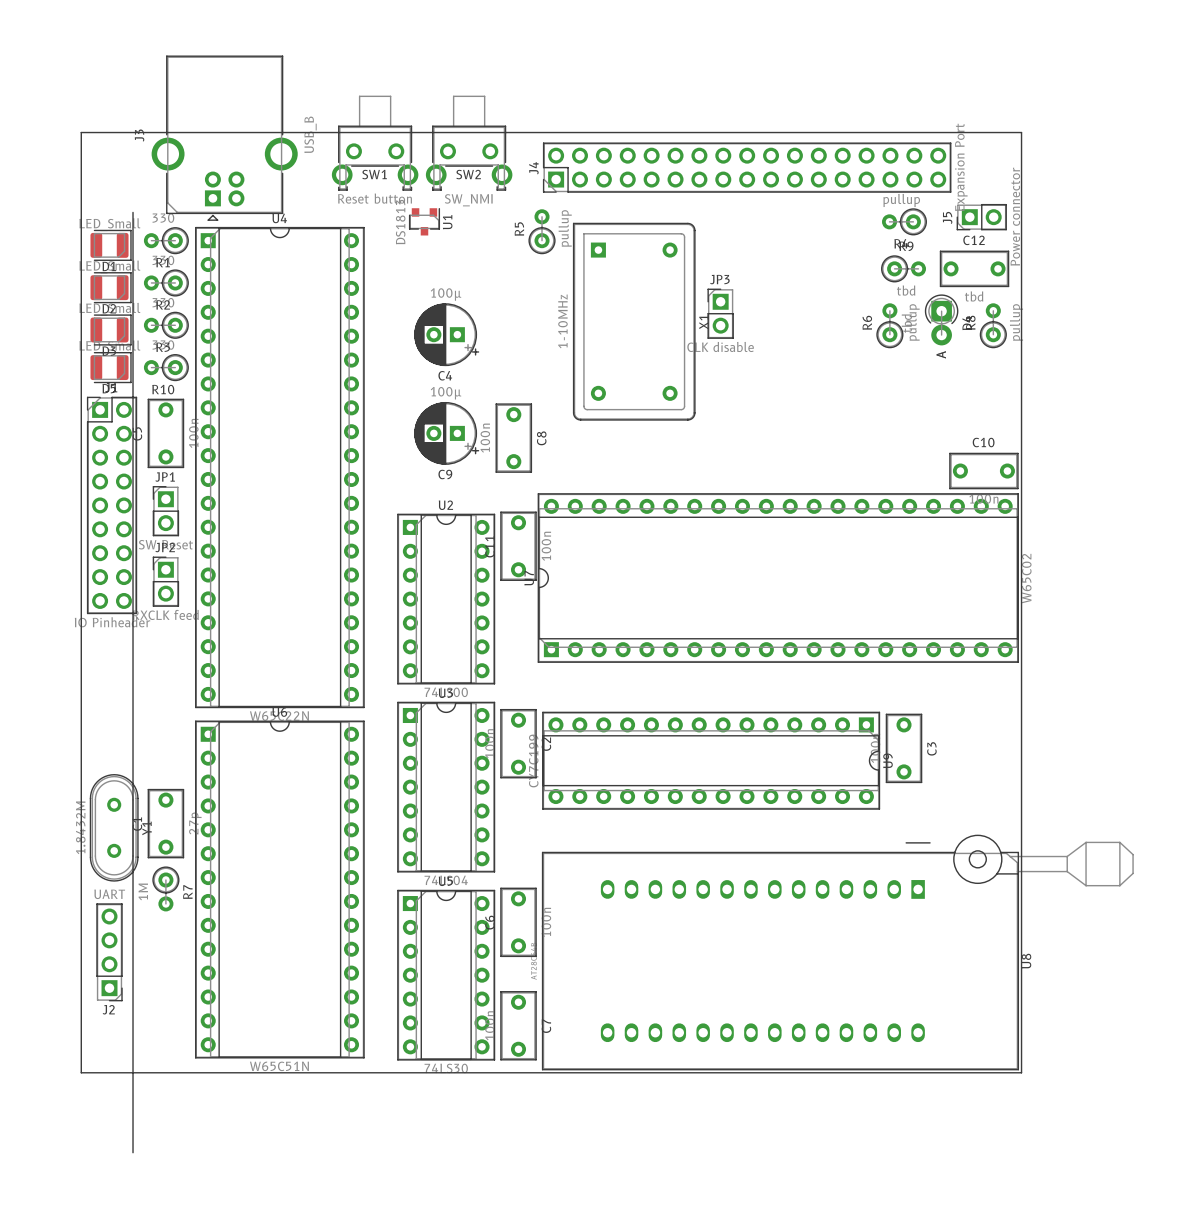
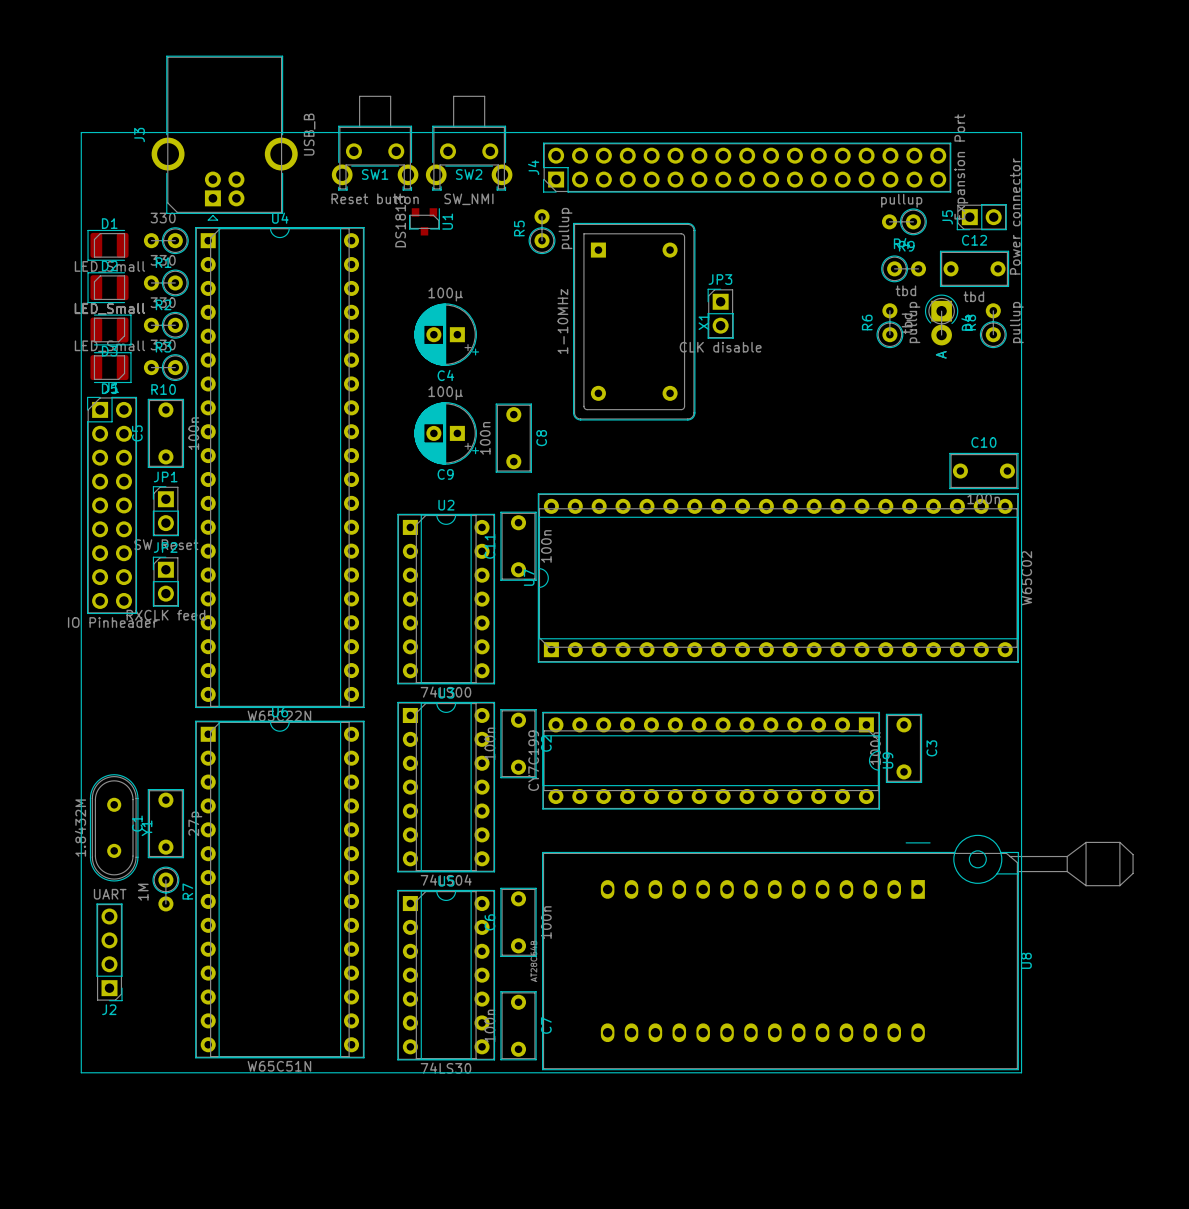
line: (133, 212) (133, 1152) -> none
D1 rotation: 0° (111, 245) -> 180° (107, 245)
D2 rotation: 0° (111, 287) -> 180° (107, 287)

